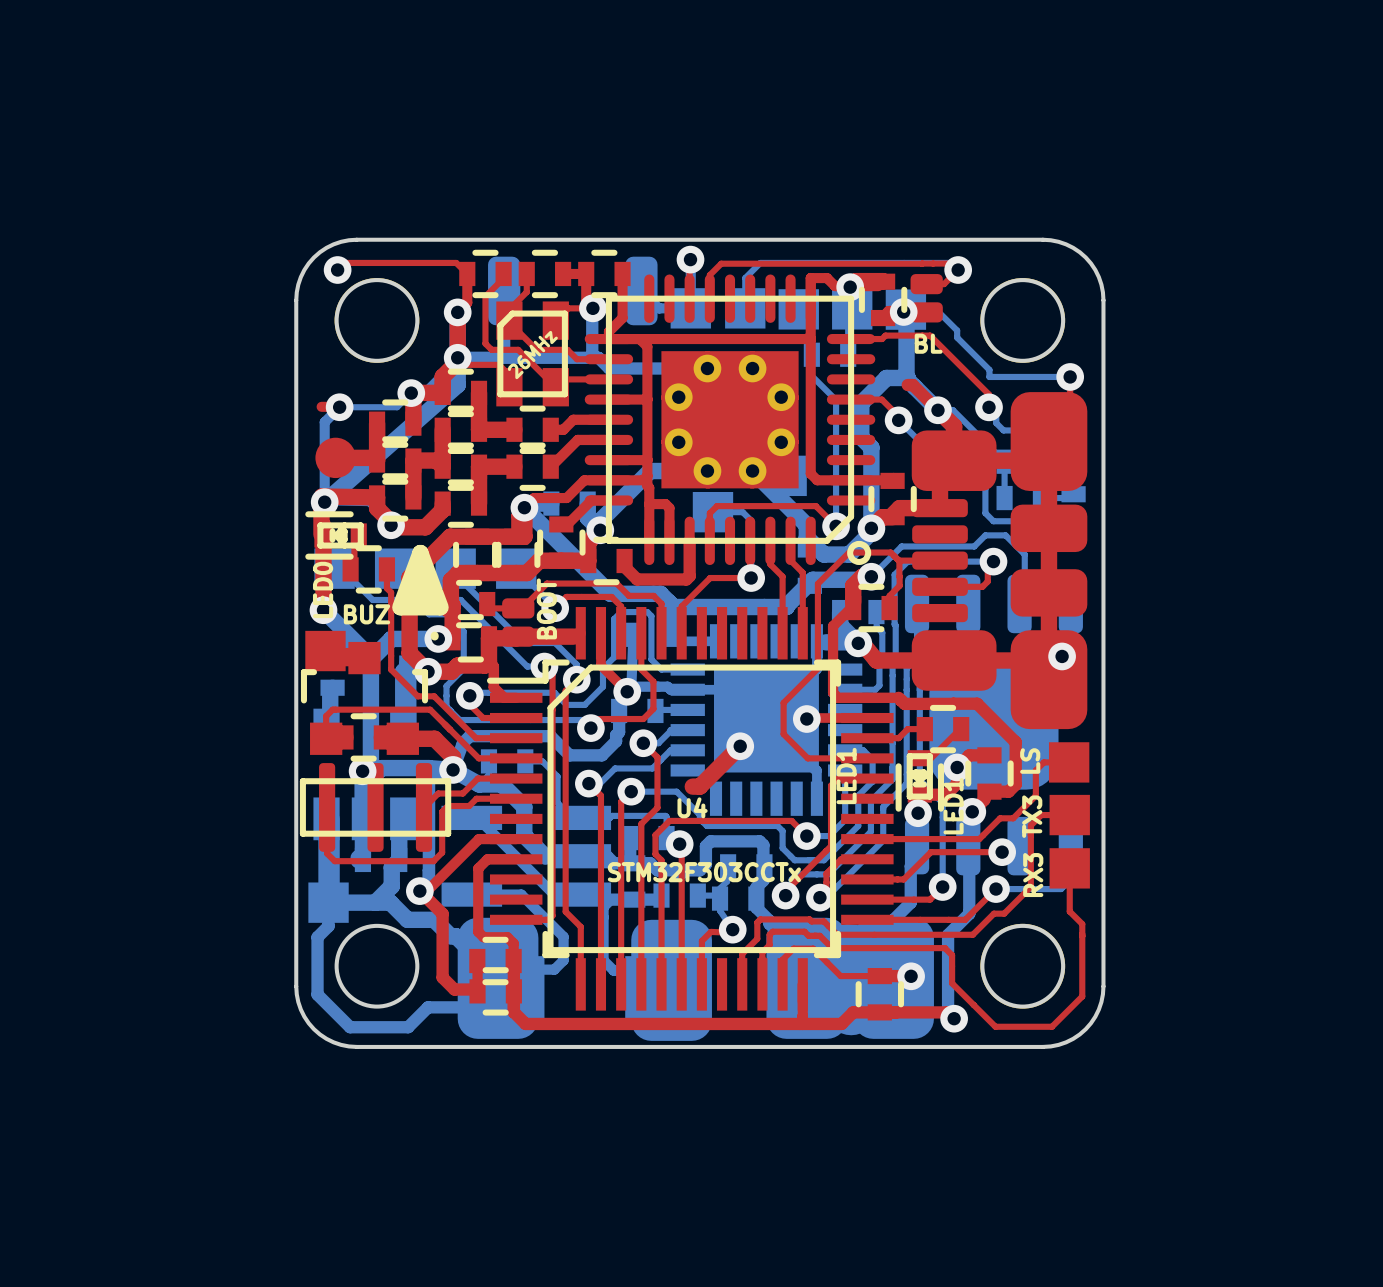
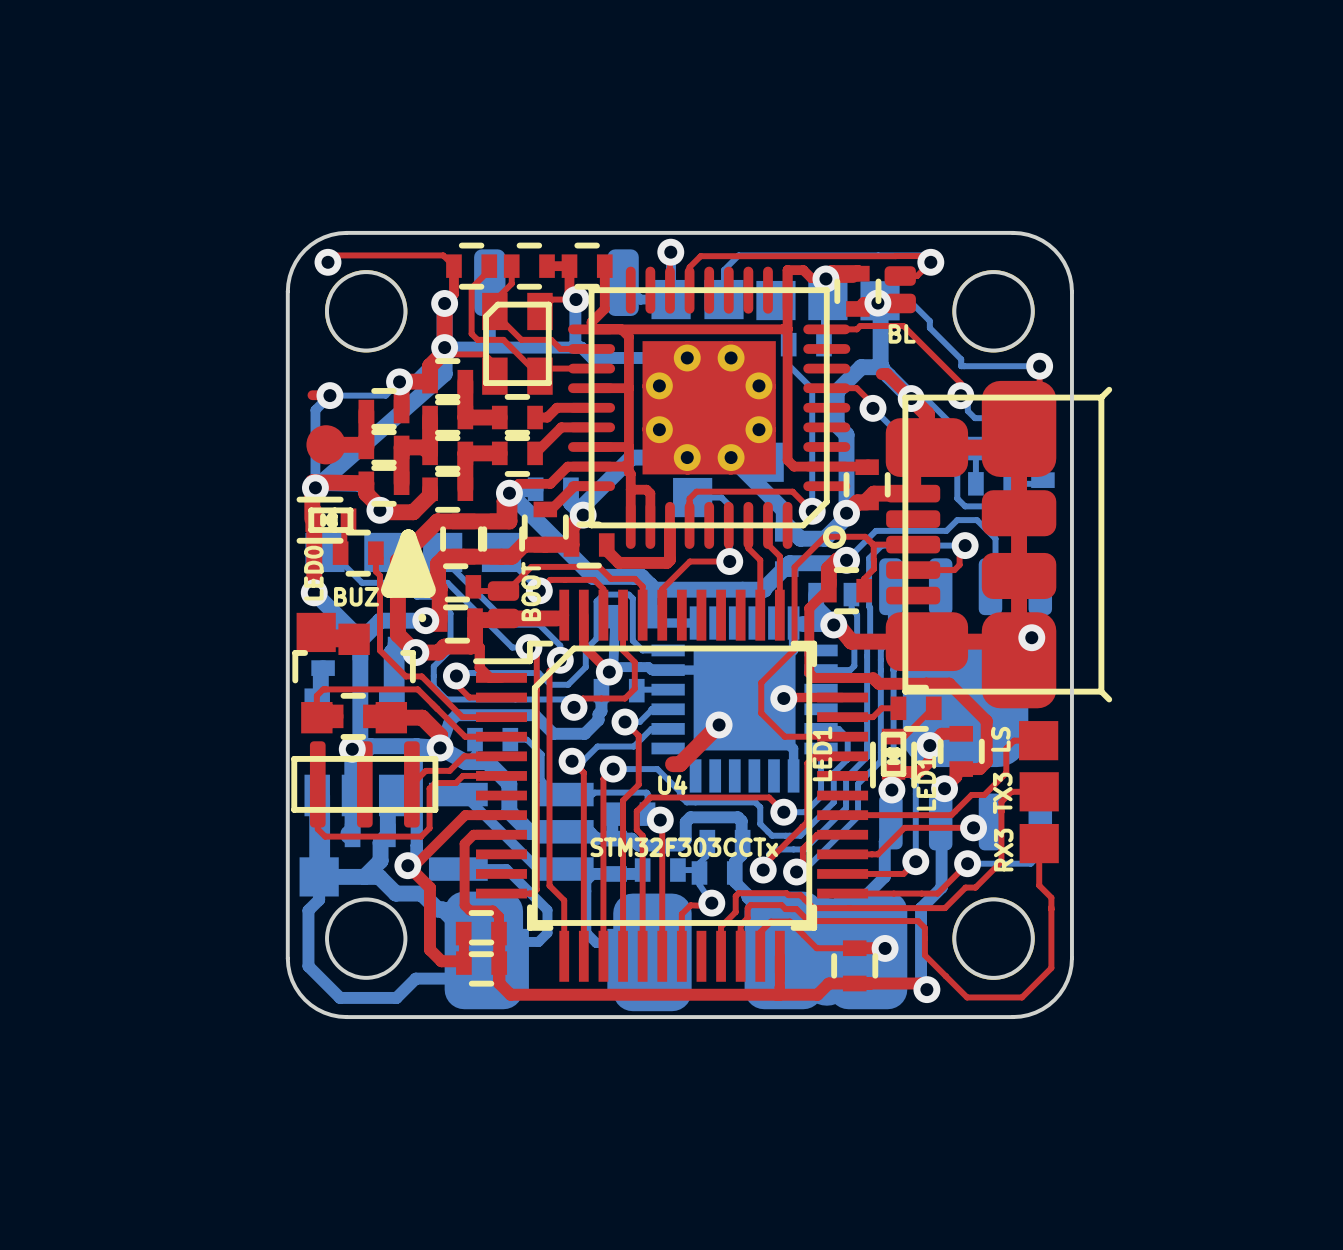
part value: 26MHz (532, 355) -> none
part footprint: [911, 392, 1088, 730] -> [885, 380, 1113, 709]

